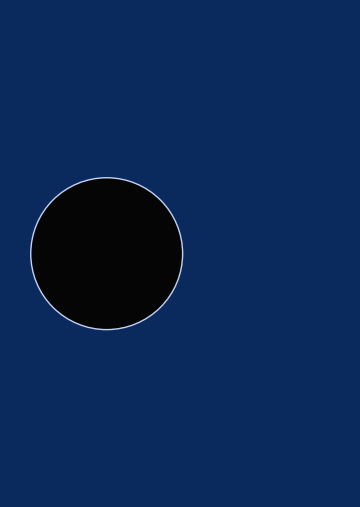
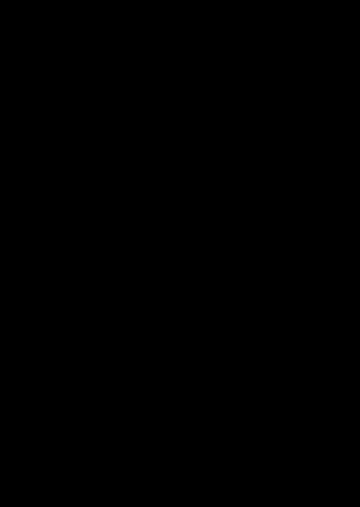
part: (106, 253) -> none

